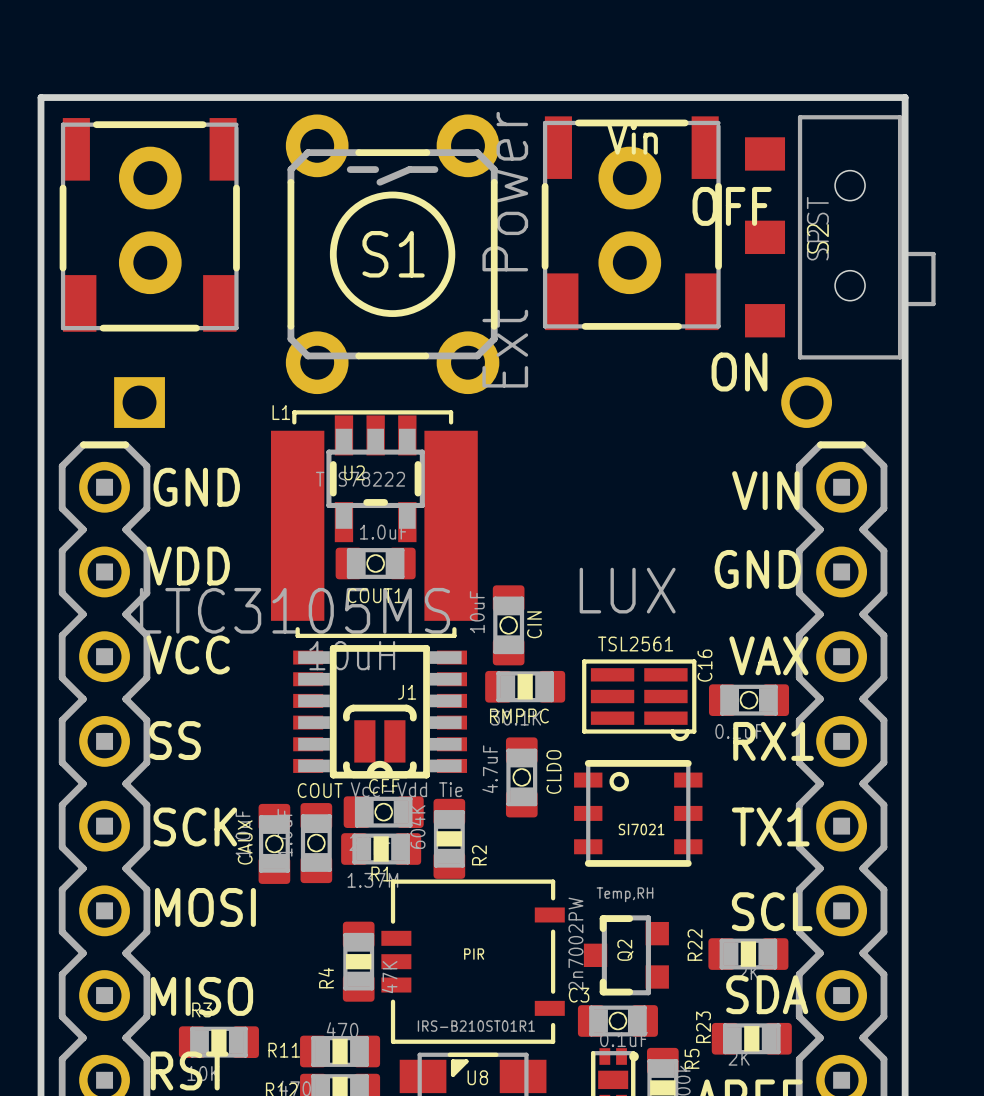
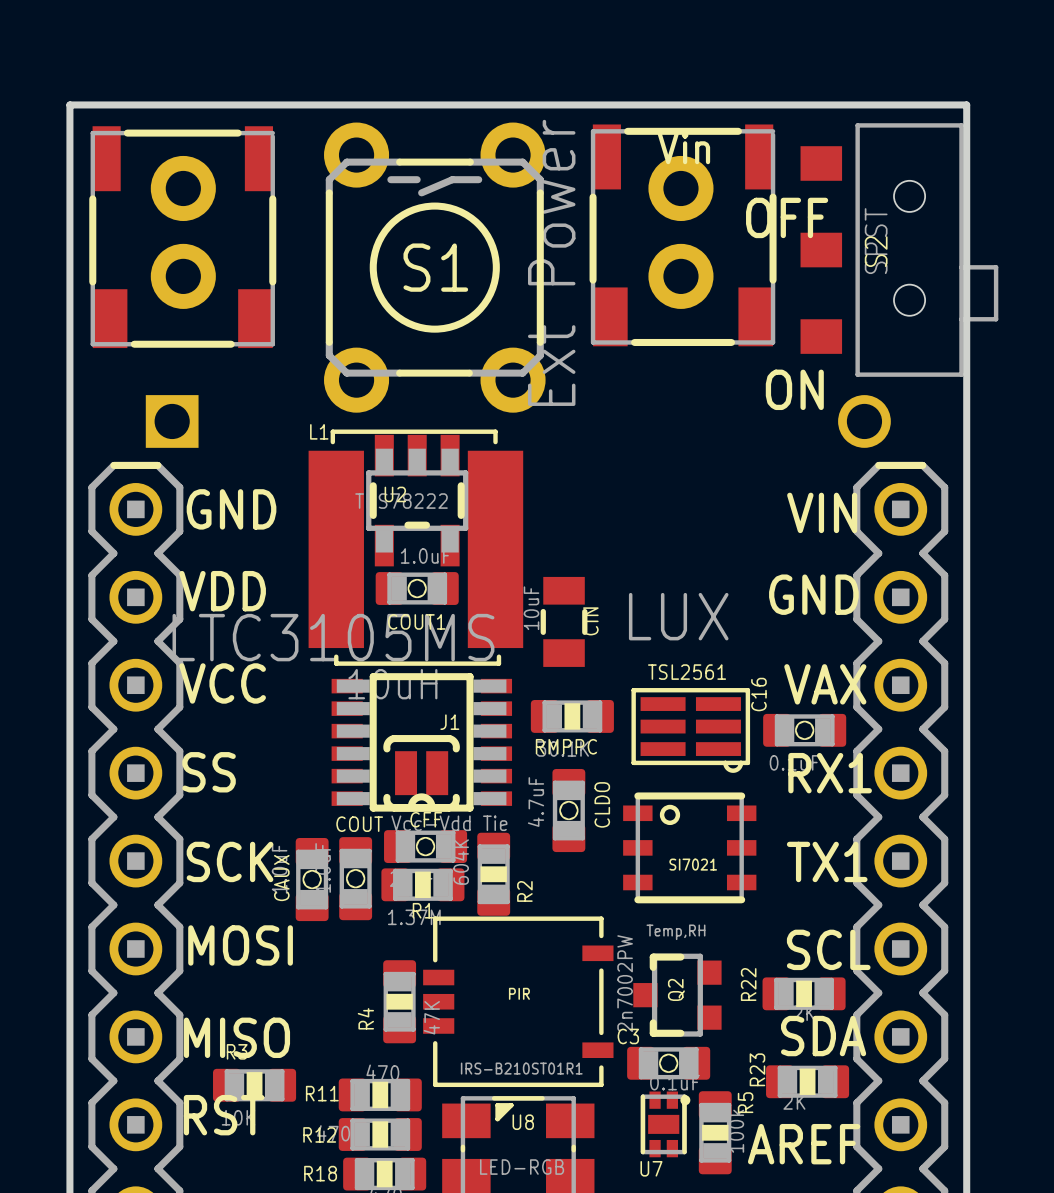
CIN footprint: [492, 585, 525, 666] -> [540, 576, 588, 667]

